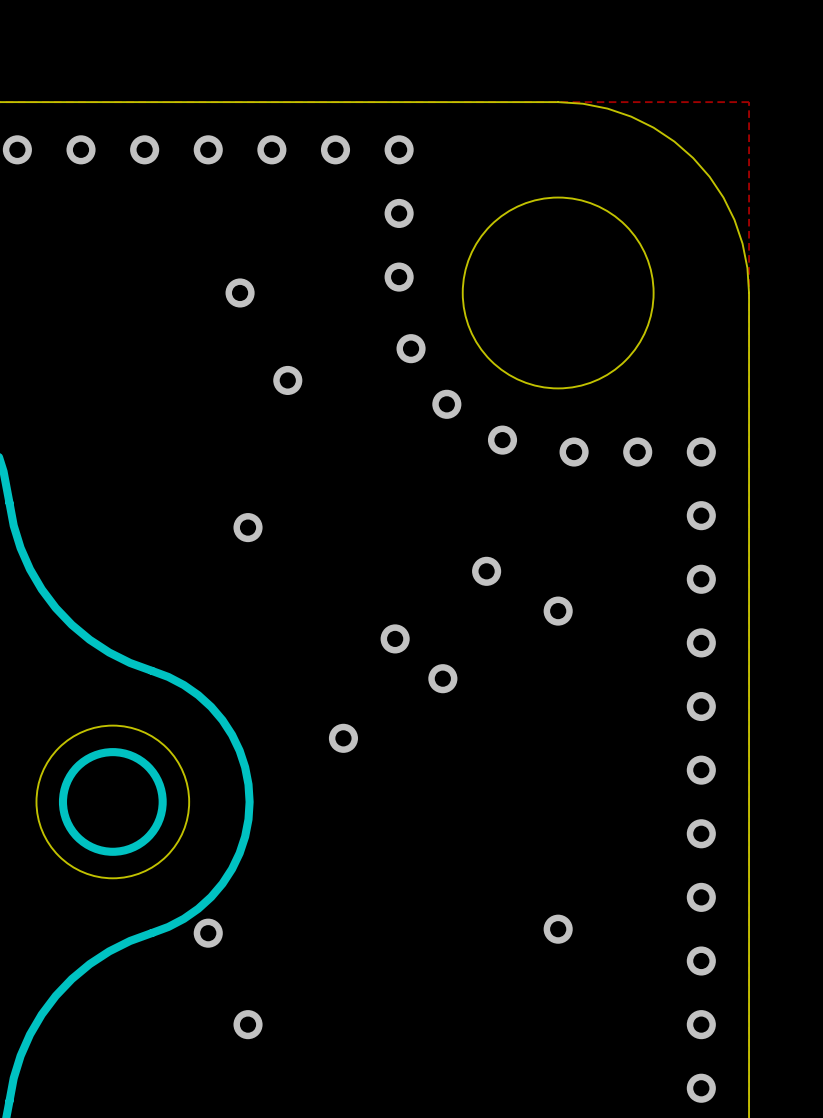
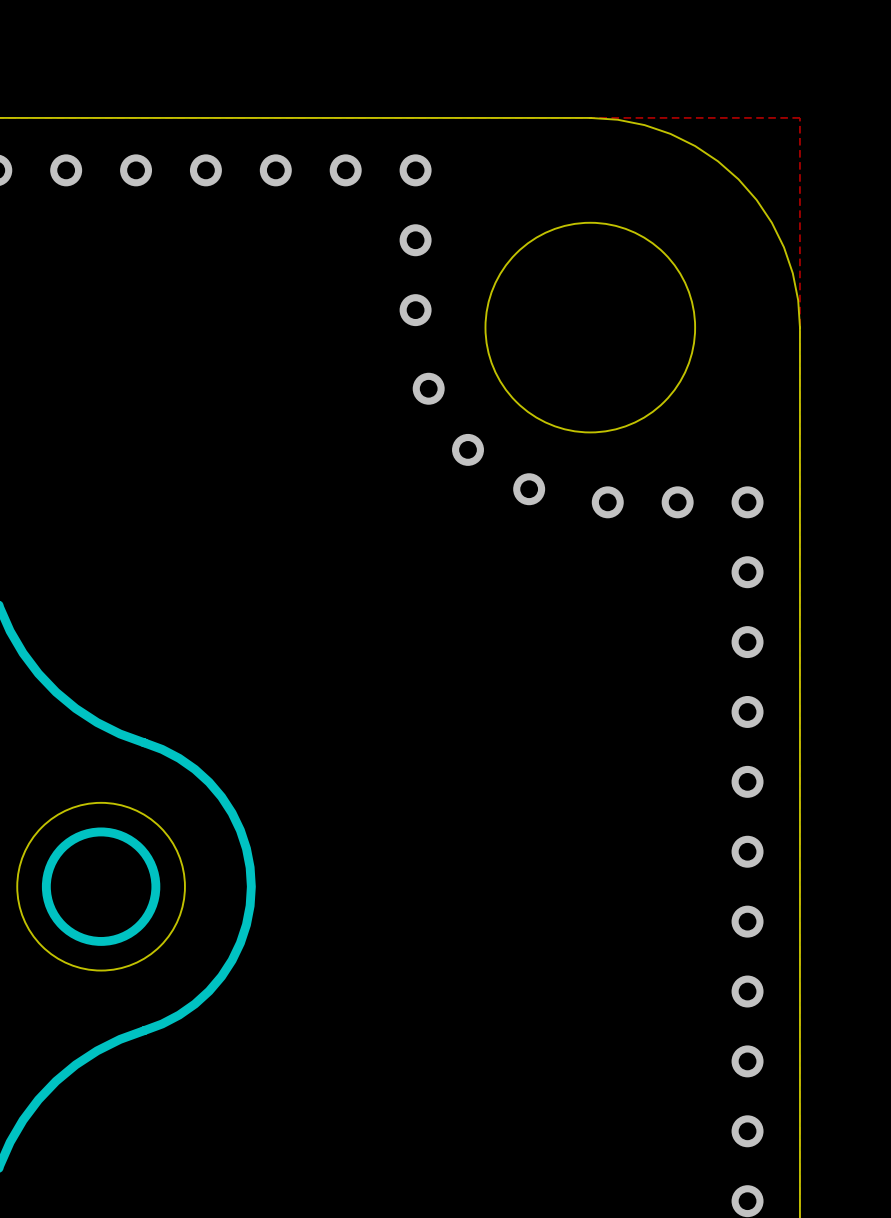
via: (240, 292) -> none
via: (287, 380) -> none
via: (248, 527) -> none
via: (486, 571) -> none
via: (558, 611) -> none
via: (395, 638) -> none
via: (442, 678) -> none
via: (343, 738) -> none
via: (558, 929) -> none
via: (208, 933) -> none
via: (248, 1024) -> none

